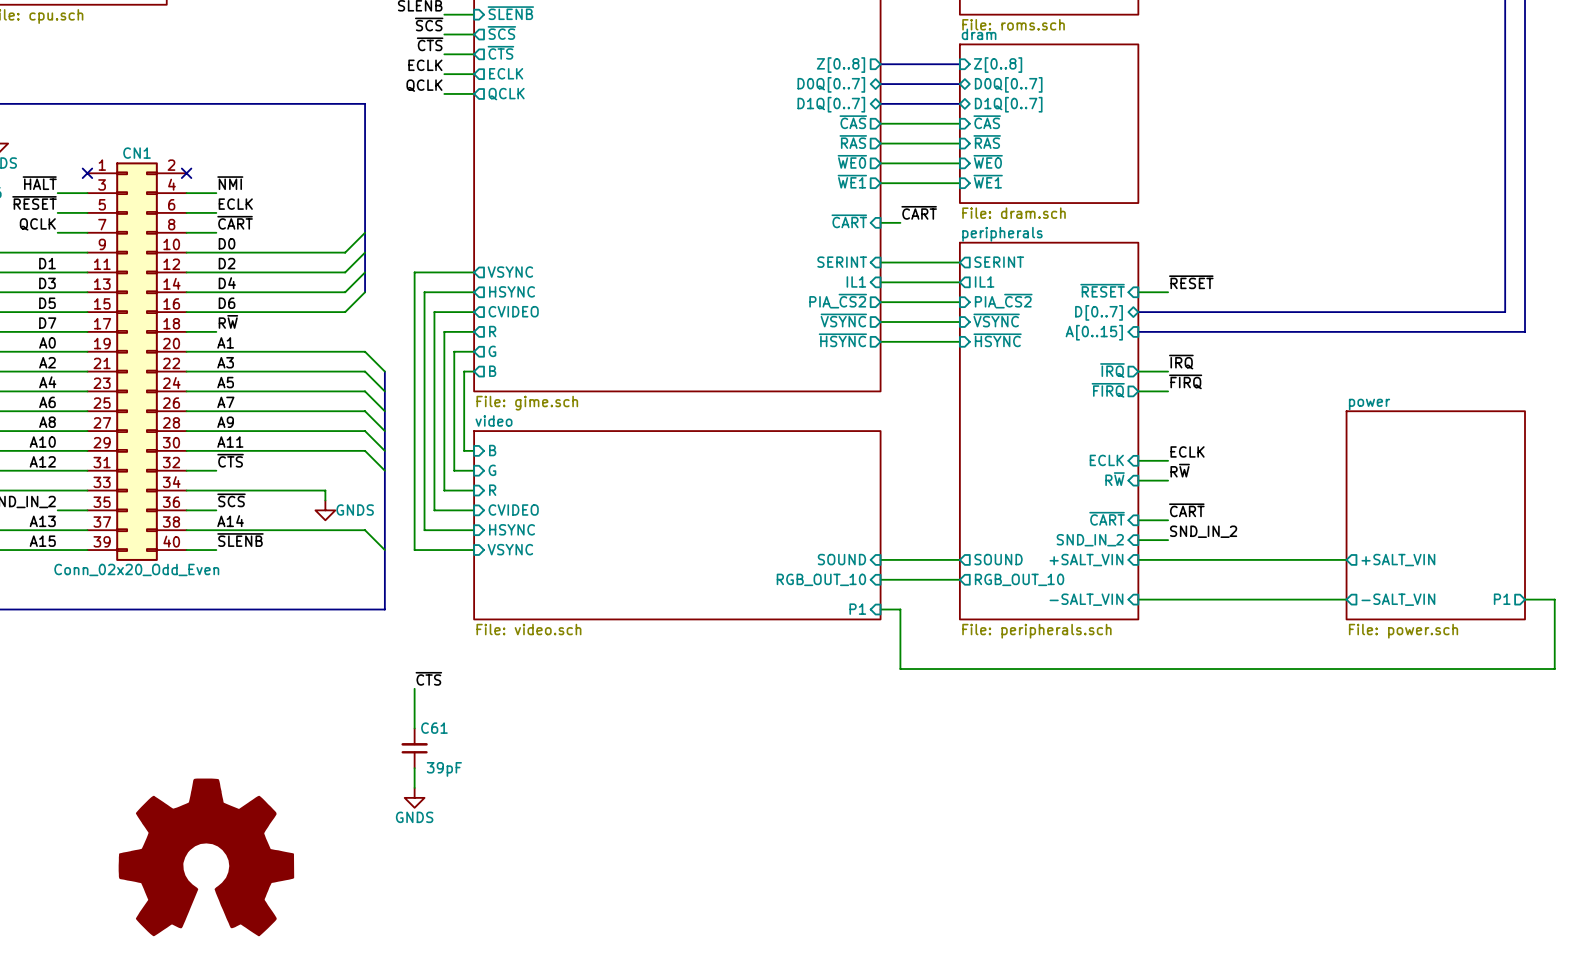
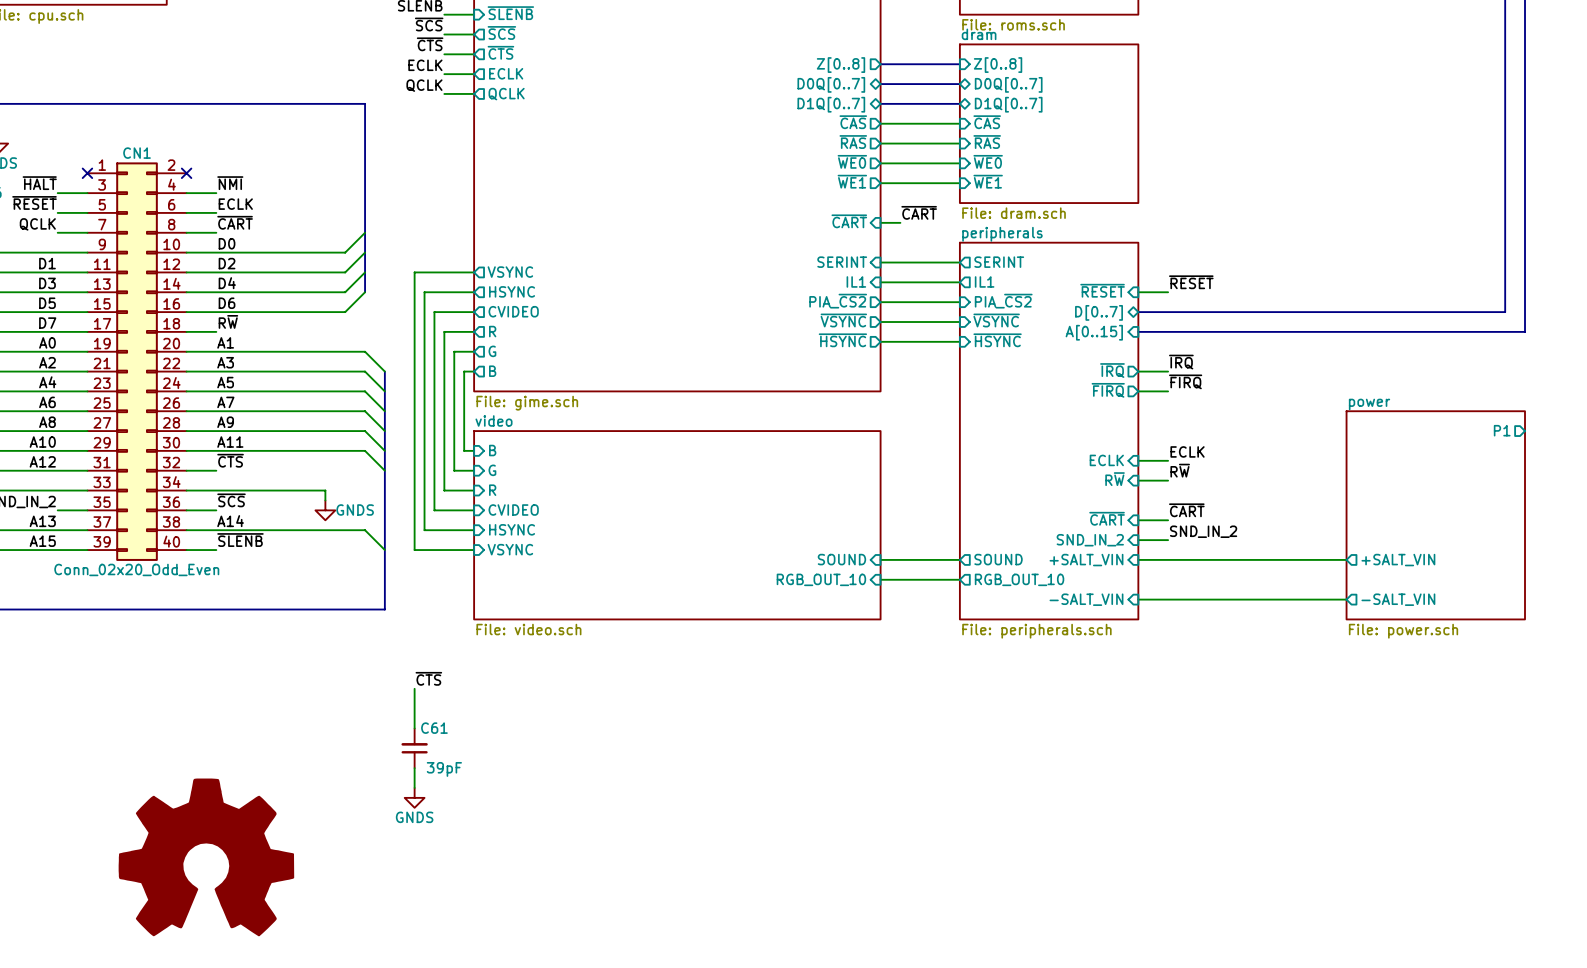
sheet pin position: P1 (1502, 599) -> P1 (1502, 430)
wire: (1525, 599) (1554, 599) (1554, 669) (900, 669) (900, 609) (880, 609) -> none
sheet pin: P1 (857, 609) -> none

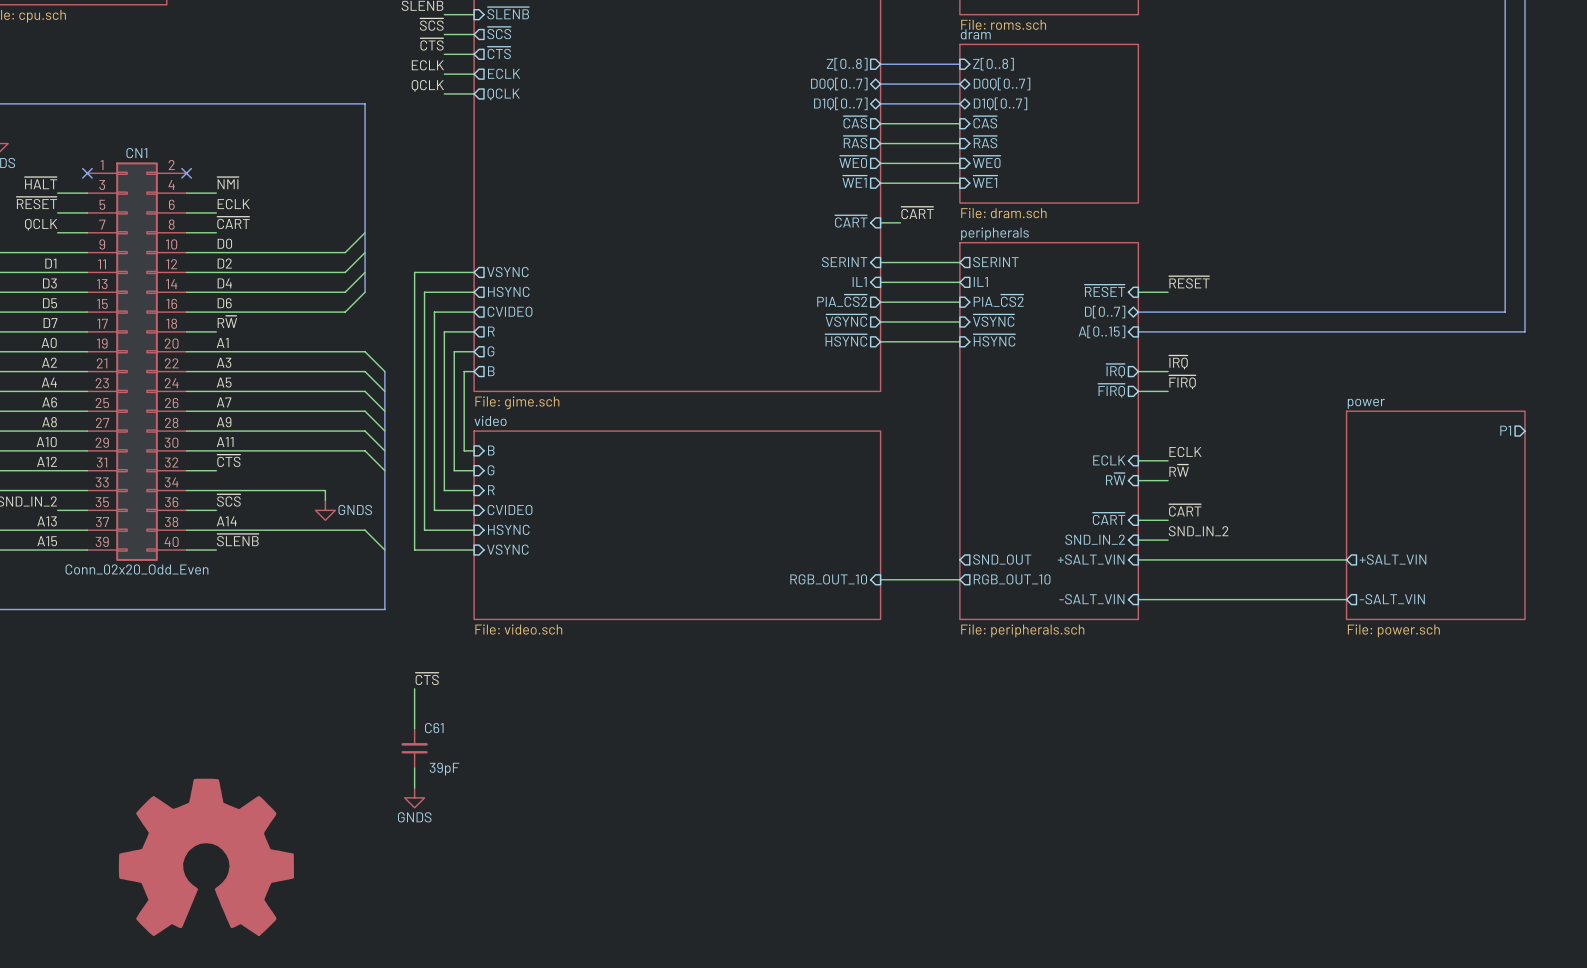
sheet pin: SOUND (841, 559) -> none
wire: (880, 559) (959, 559) -> none
sheet pin: SOUND (998, 559) -> SND_OUT (1002, 559)

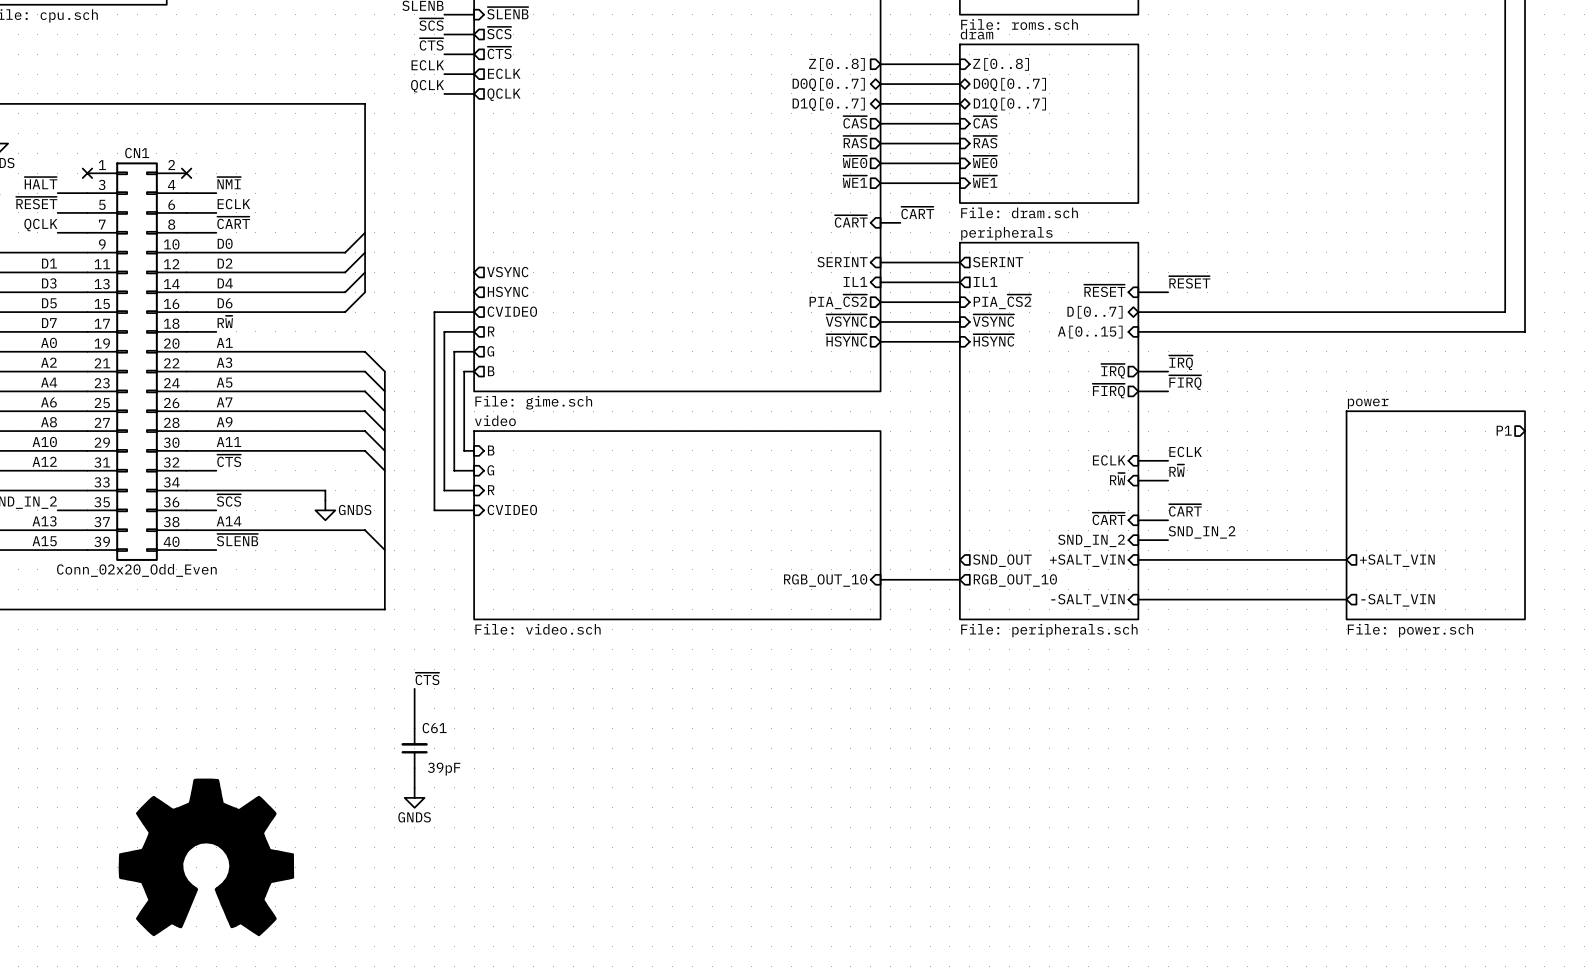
wire: (474, 272) (414, 272) (414, 550) (474, 550) -> none
wire: (474, 292) (424, 292) (424, 530) (474, 530) -> none
sheet pin: HSYNC (508, 529) -> none
sheet pin: VSYNC (507, 549) -> none

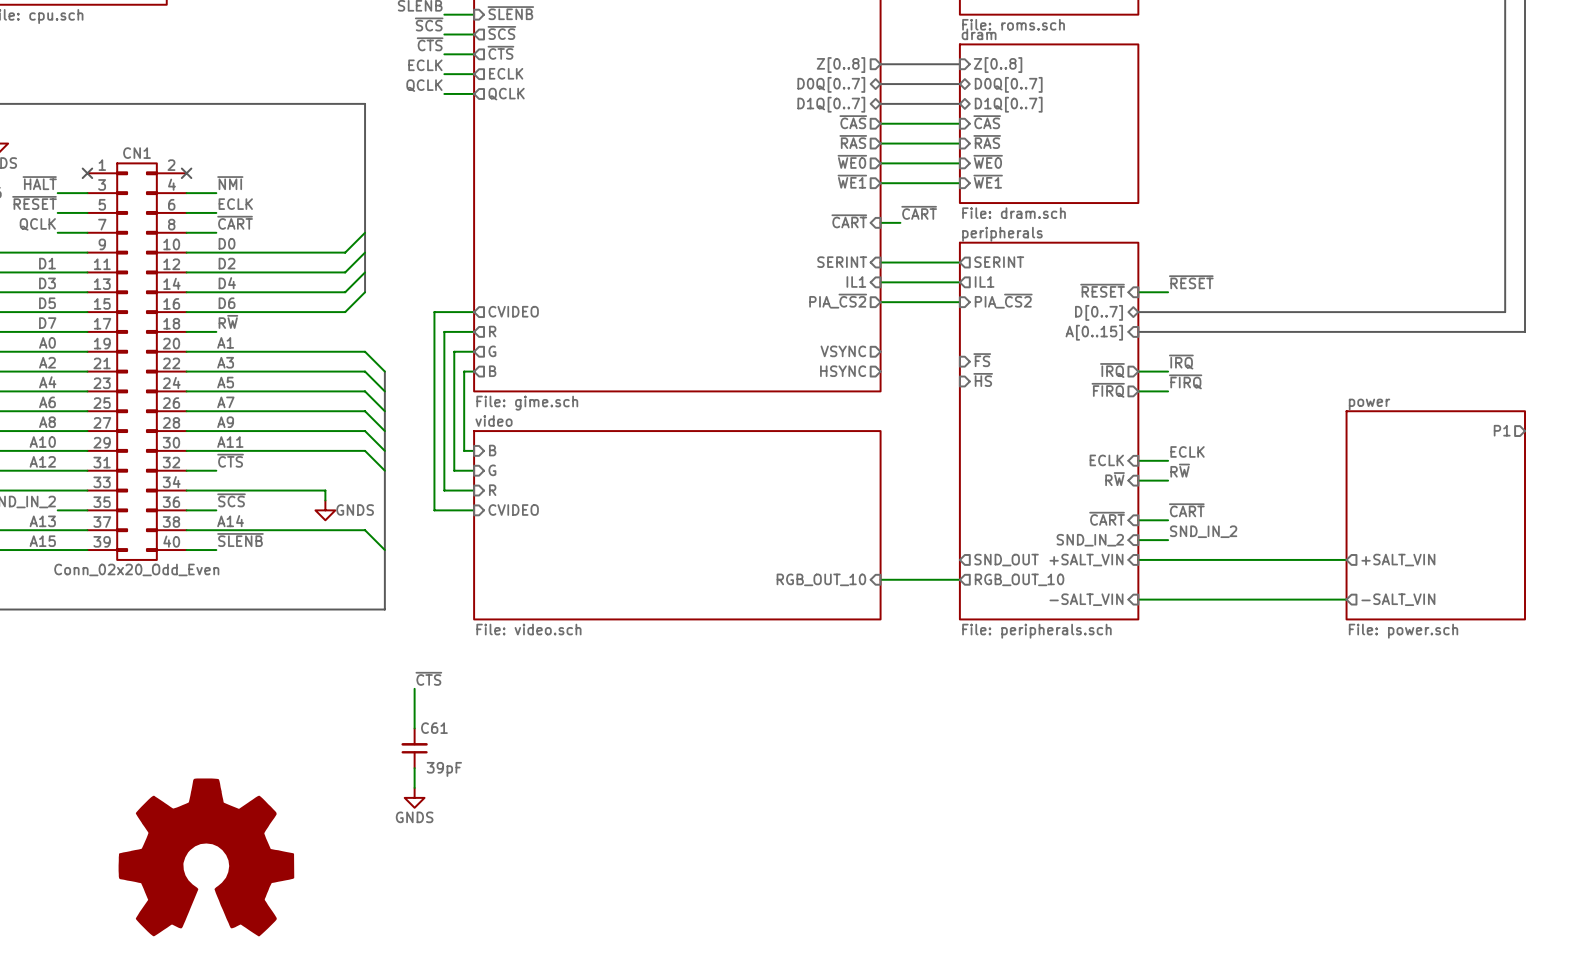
sheet pin: VSYNC (507, 272) -> none
sheet pin: HSYNC (508, 291) -> none
sheet pin: ~{VSYNC} (846, 320) -> none
sheet pin: ~{VSYNC} (993, 320) -> none
wire: (880, 322) (959, 322) -> none
sheet pin: ~{HSYNC} (846, 340) -> VSYNC (843, 351)
sheet pin: ~{HSYNC} (993, 340) -> ~{FS} (982, 360)
wire: (880, 341) (959, 341) -> none
sheet pin: none -> HSYNC (843, 371)
sheet pin: none -> ~{HS} (983, 379)

